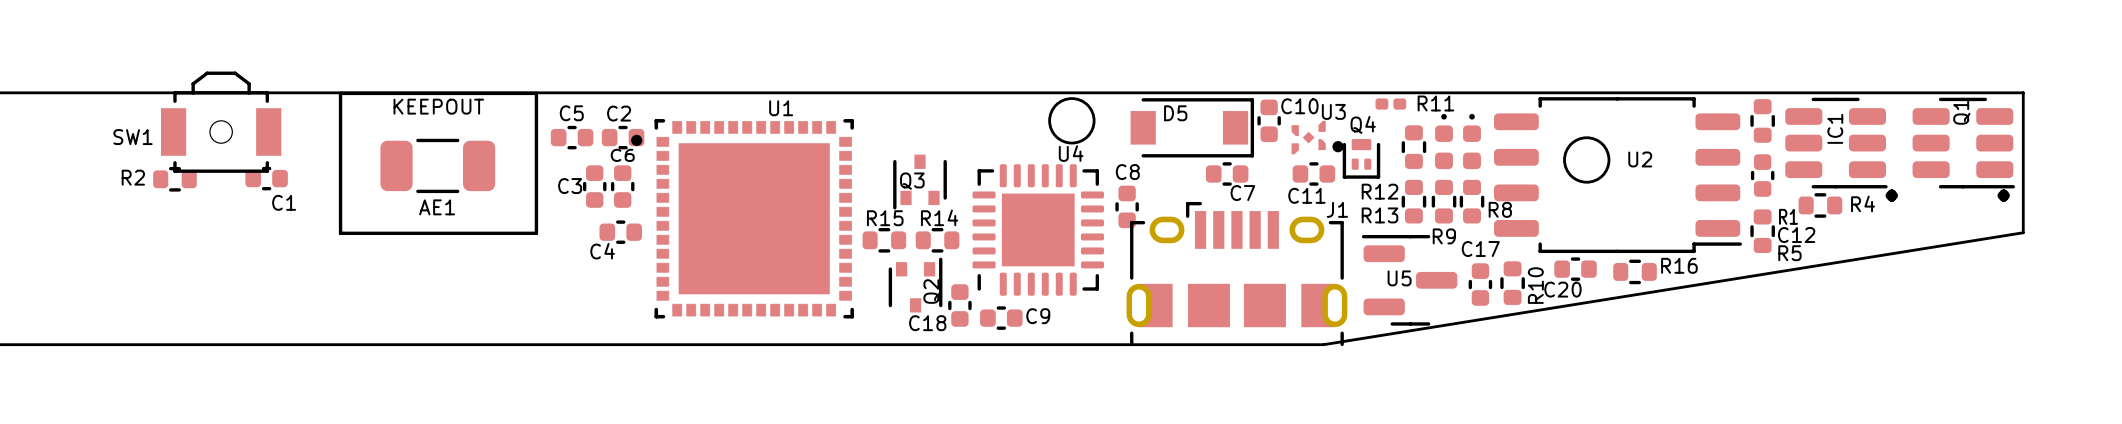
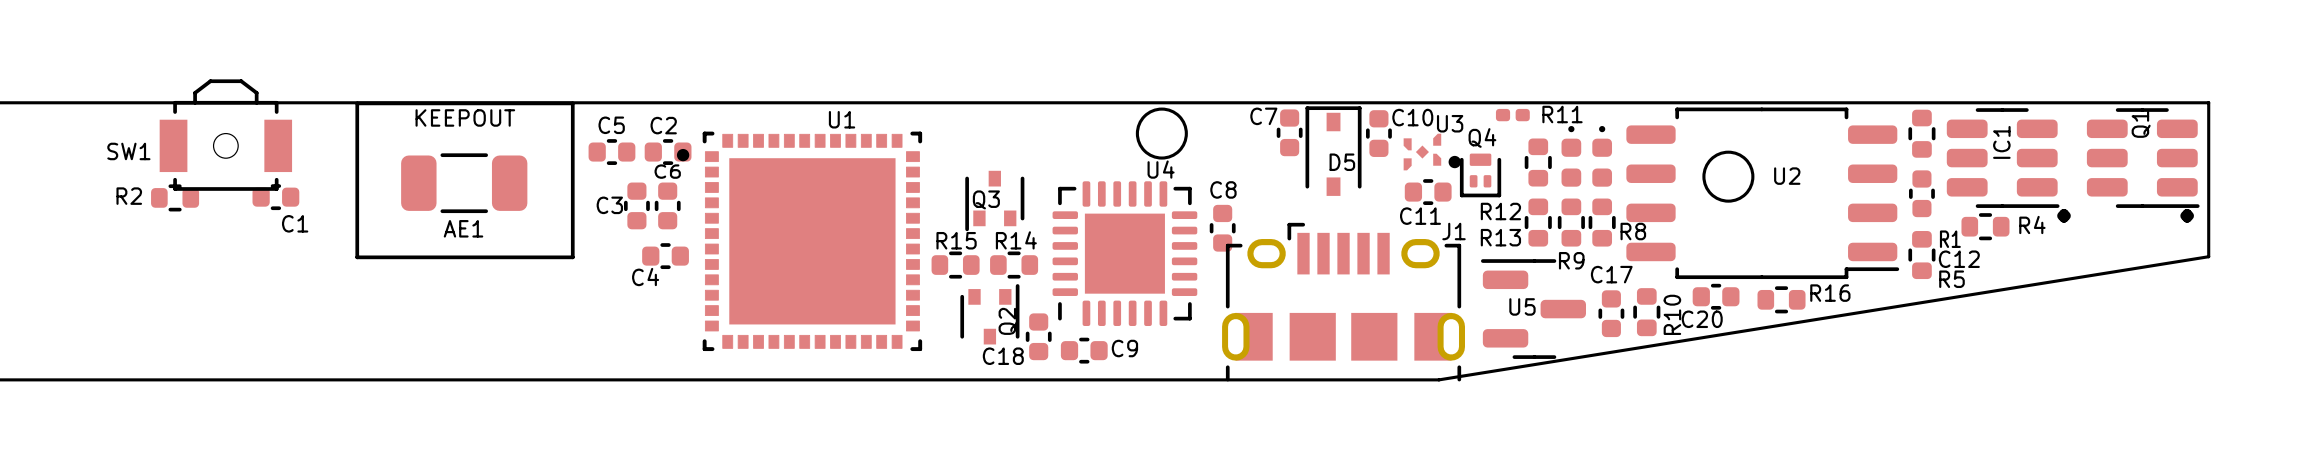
D5 footprint: [1130, 98, 1255, 158] -> [1305, 106, 1362, 196]
C7 rotation: 0° (1227, 173) -> 90° clockwise (1289, 132)
C7 position: (1227, 173) -> (1289, 132)

